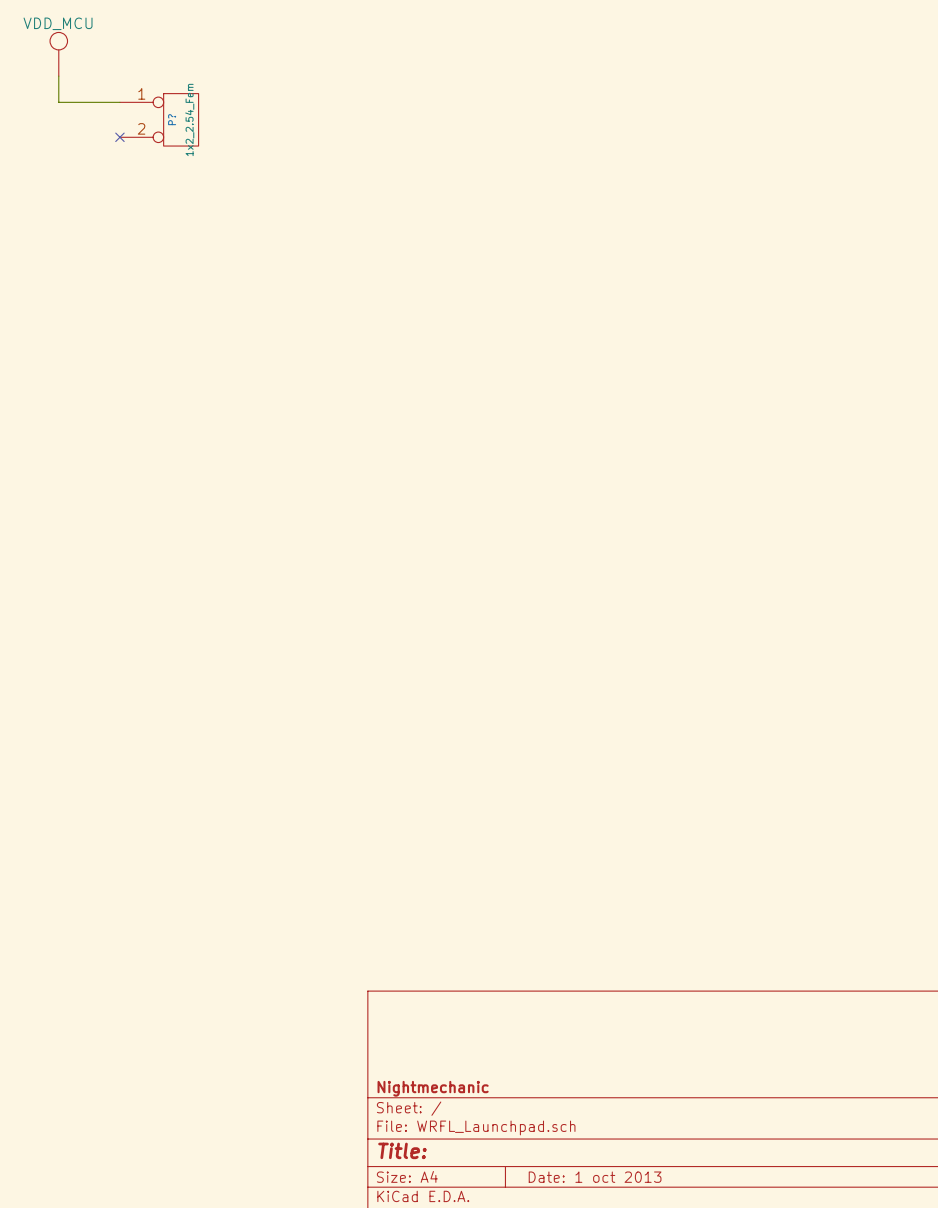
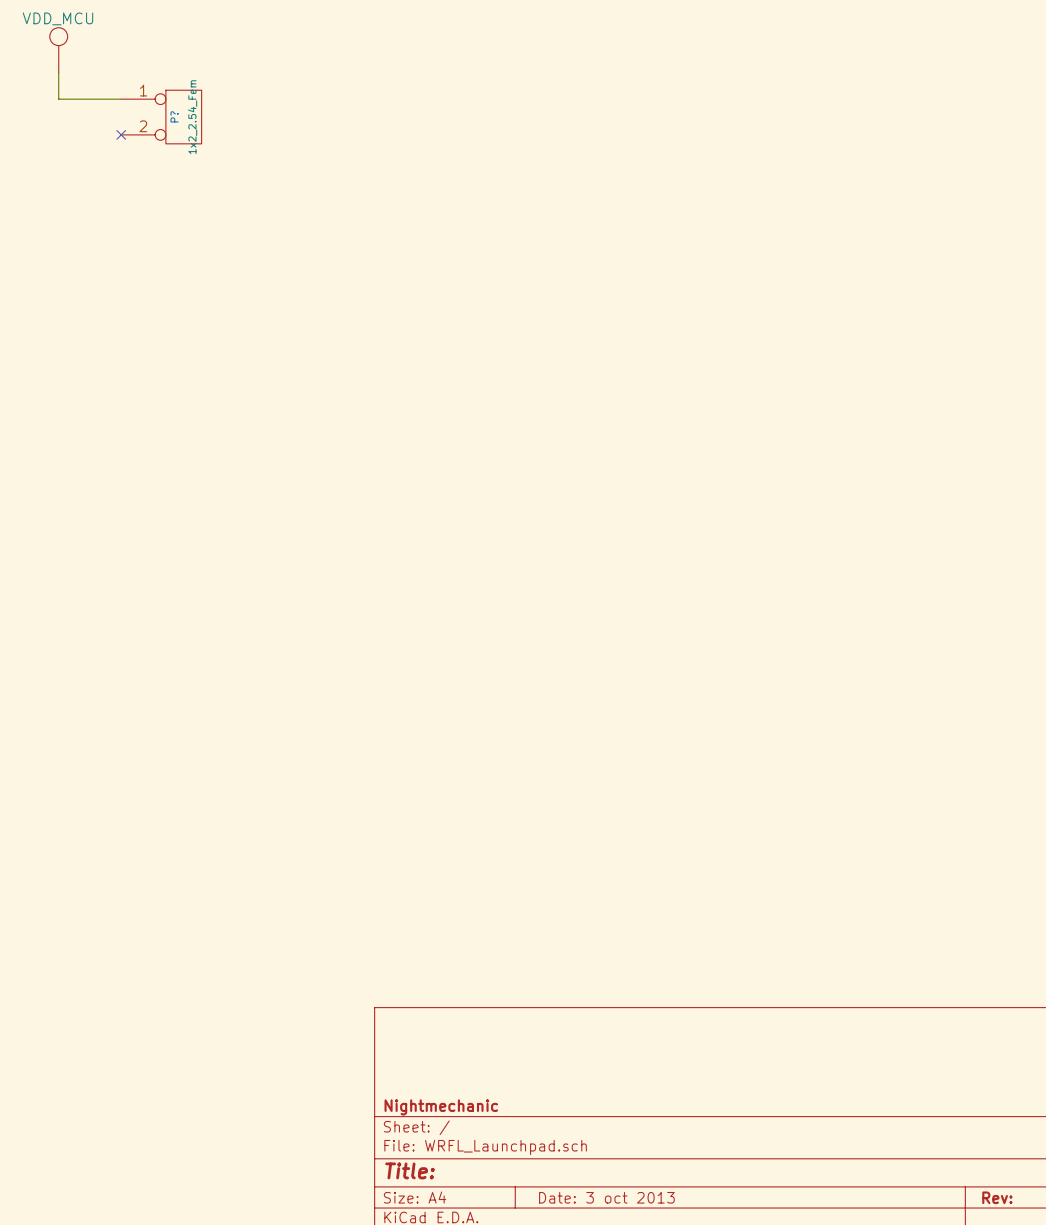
title block: Date: 1 oct 2013 (595, 1177) -> Date: 3 oct 2013 (606, 1197)

